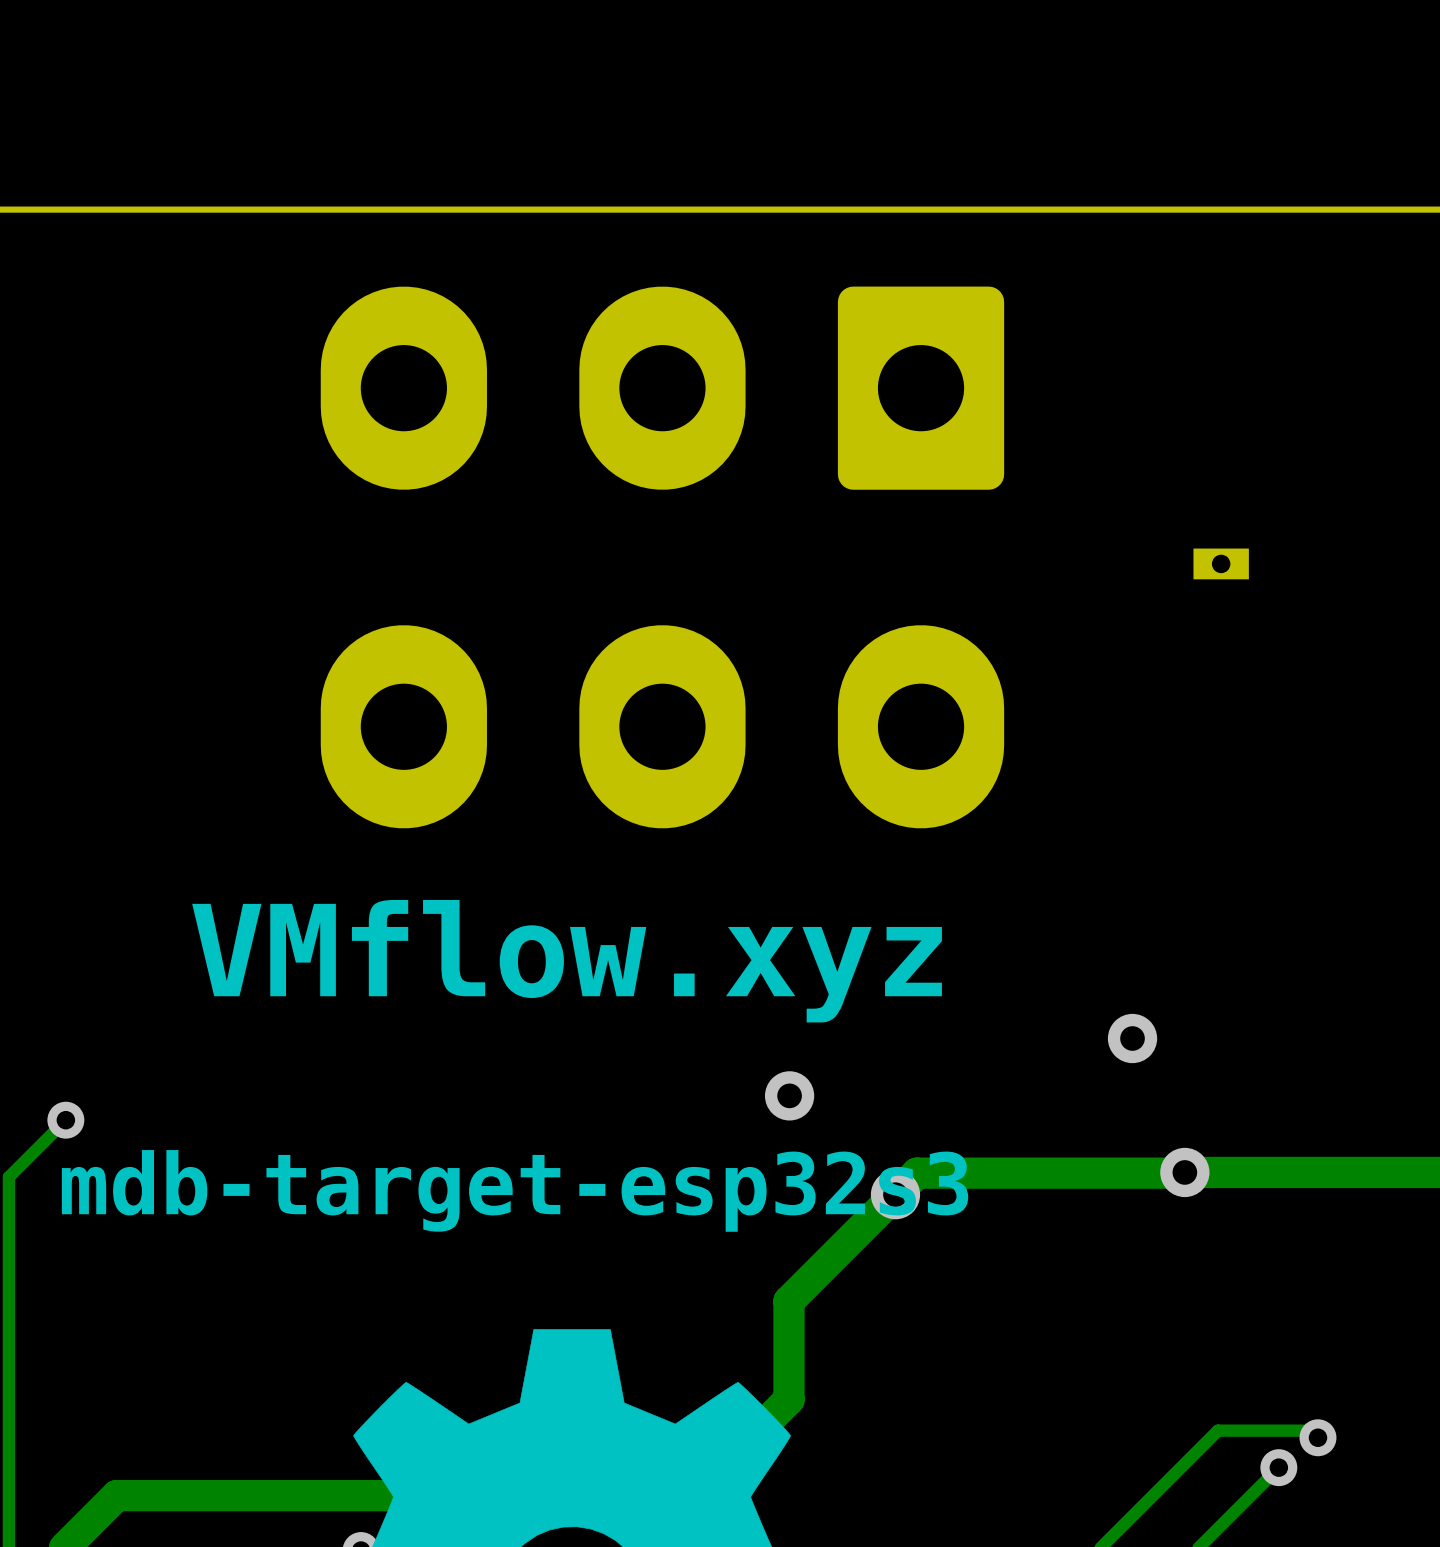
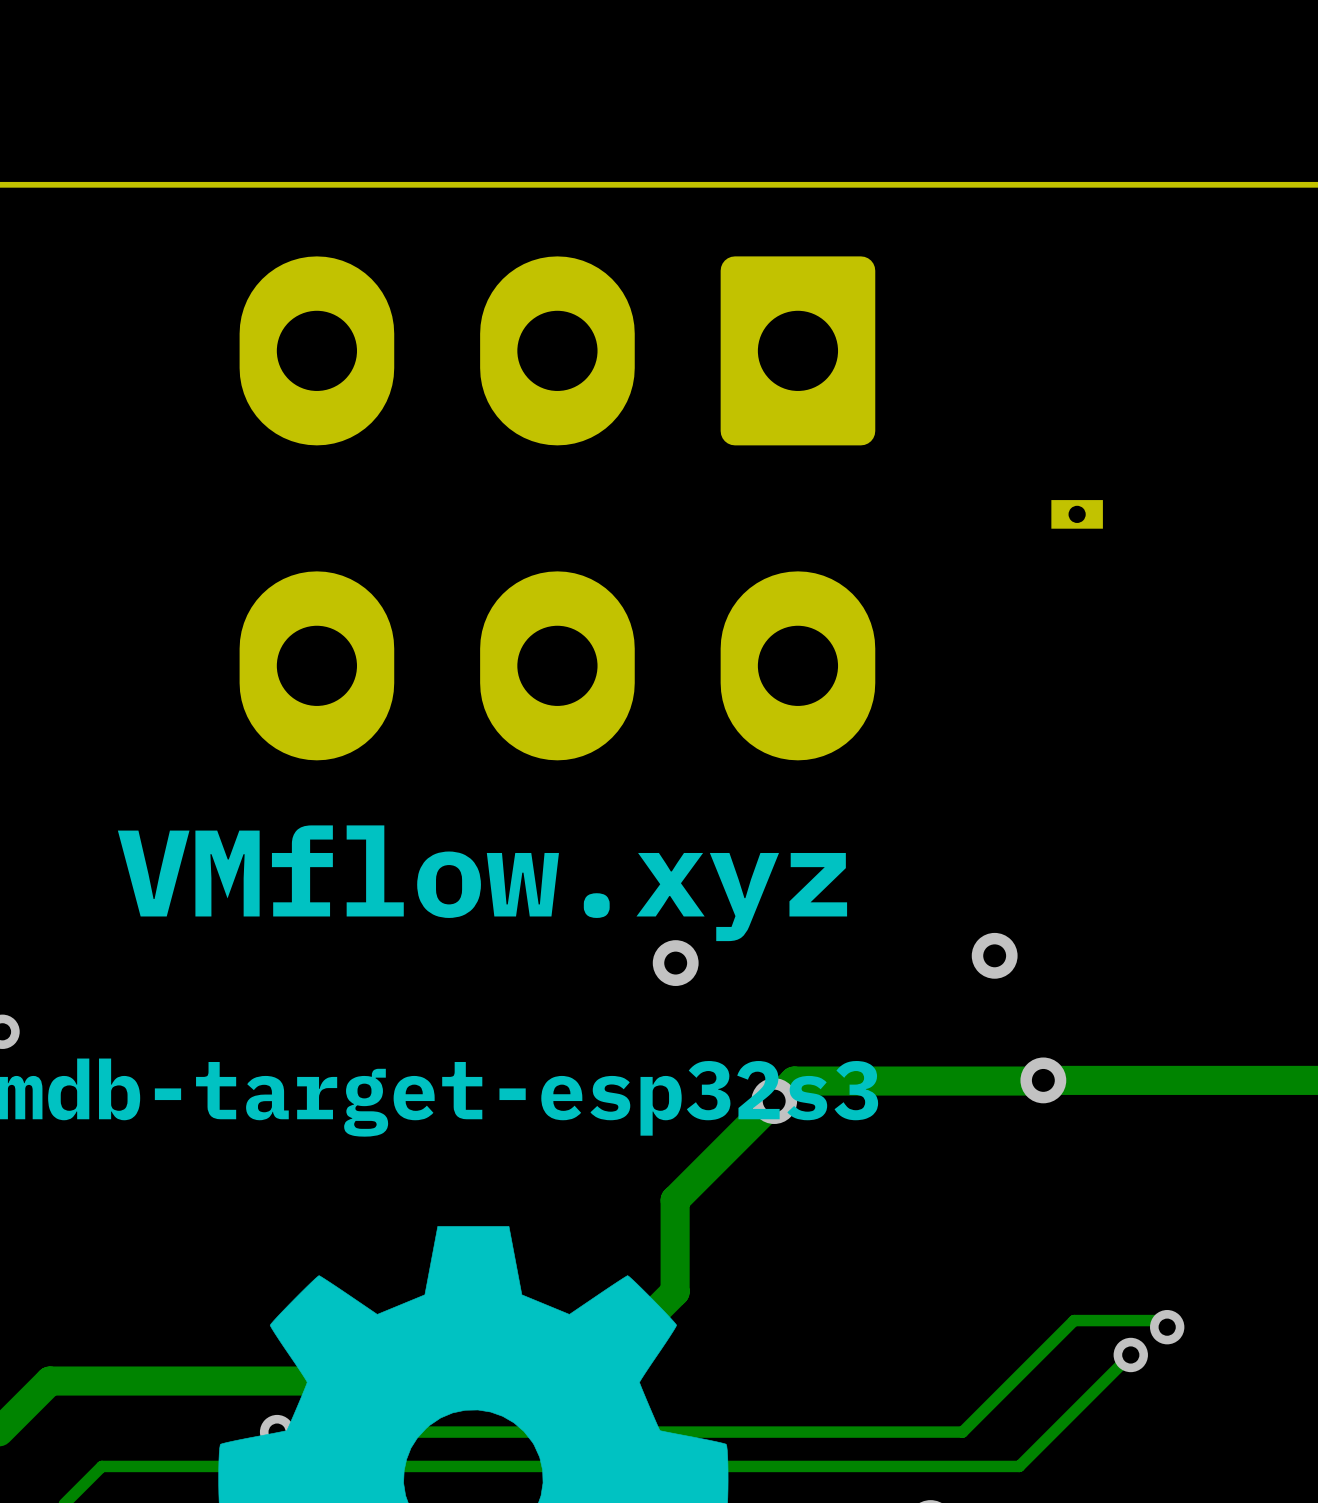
via position: (789, 1095) -> (675, 963)

